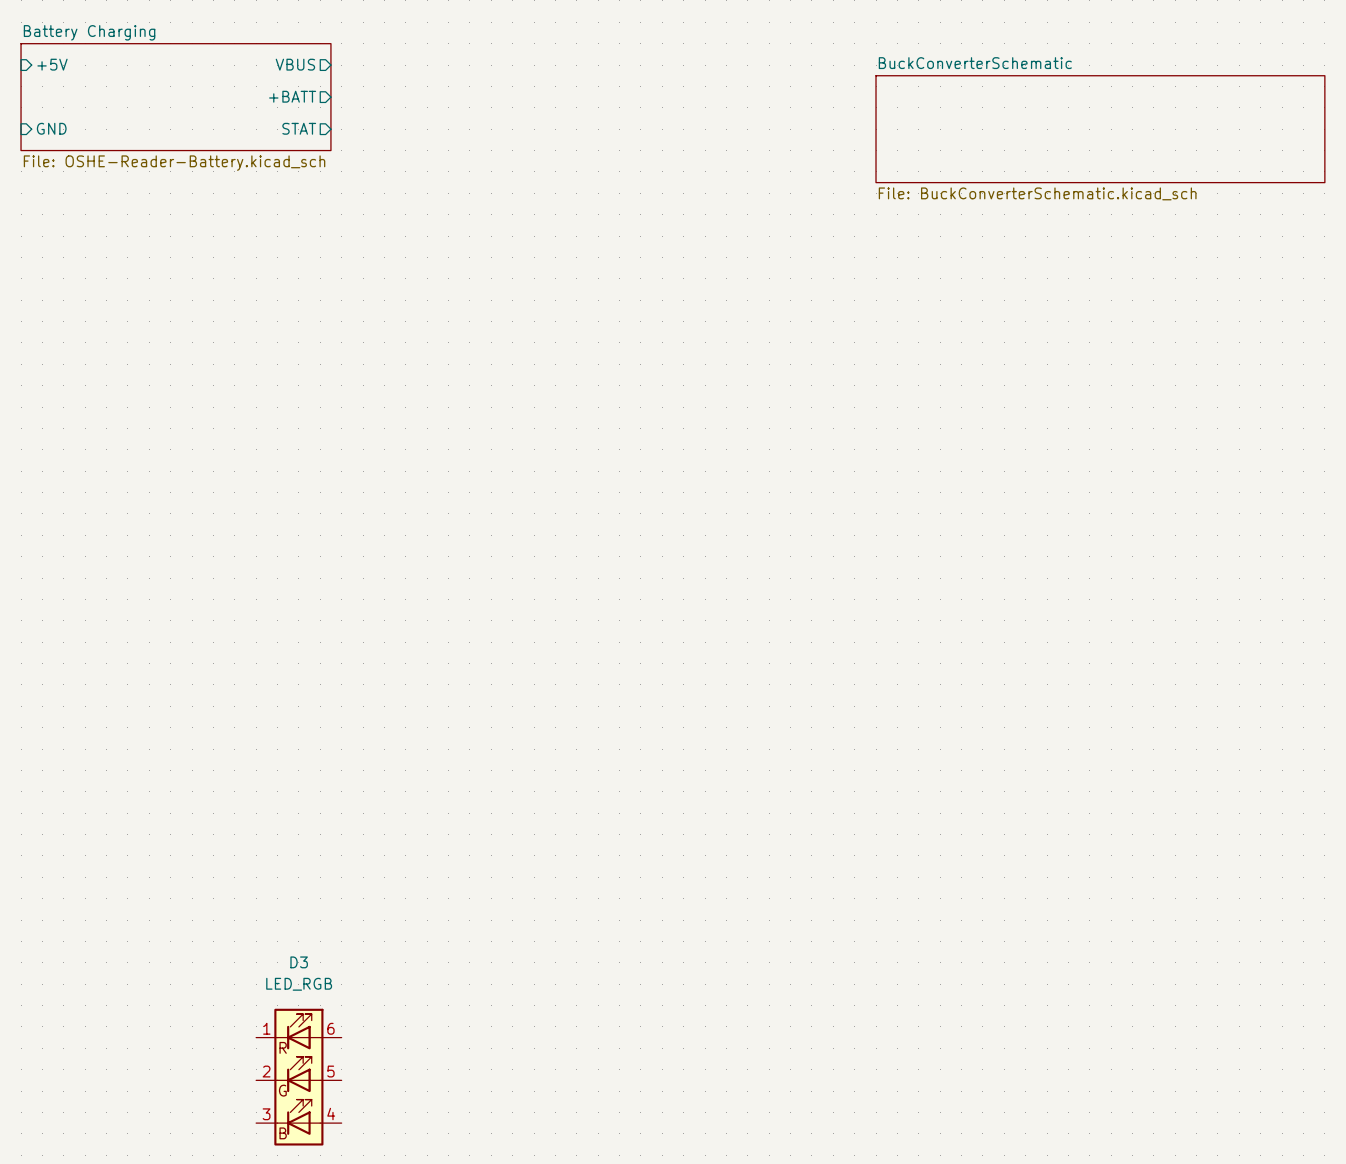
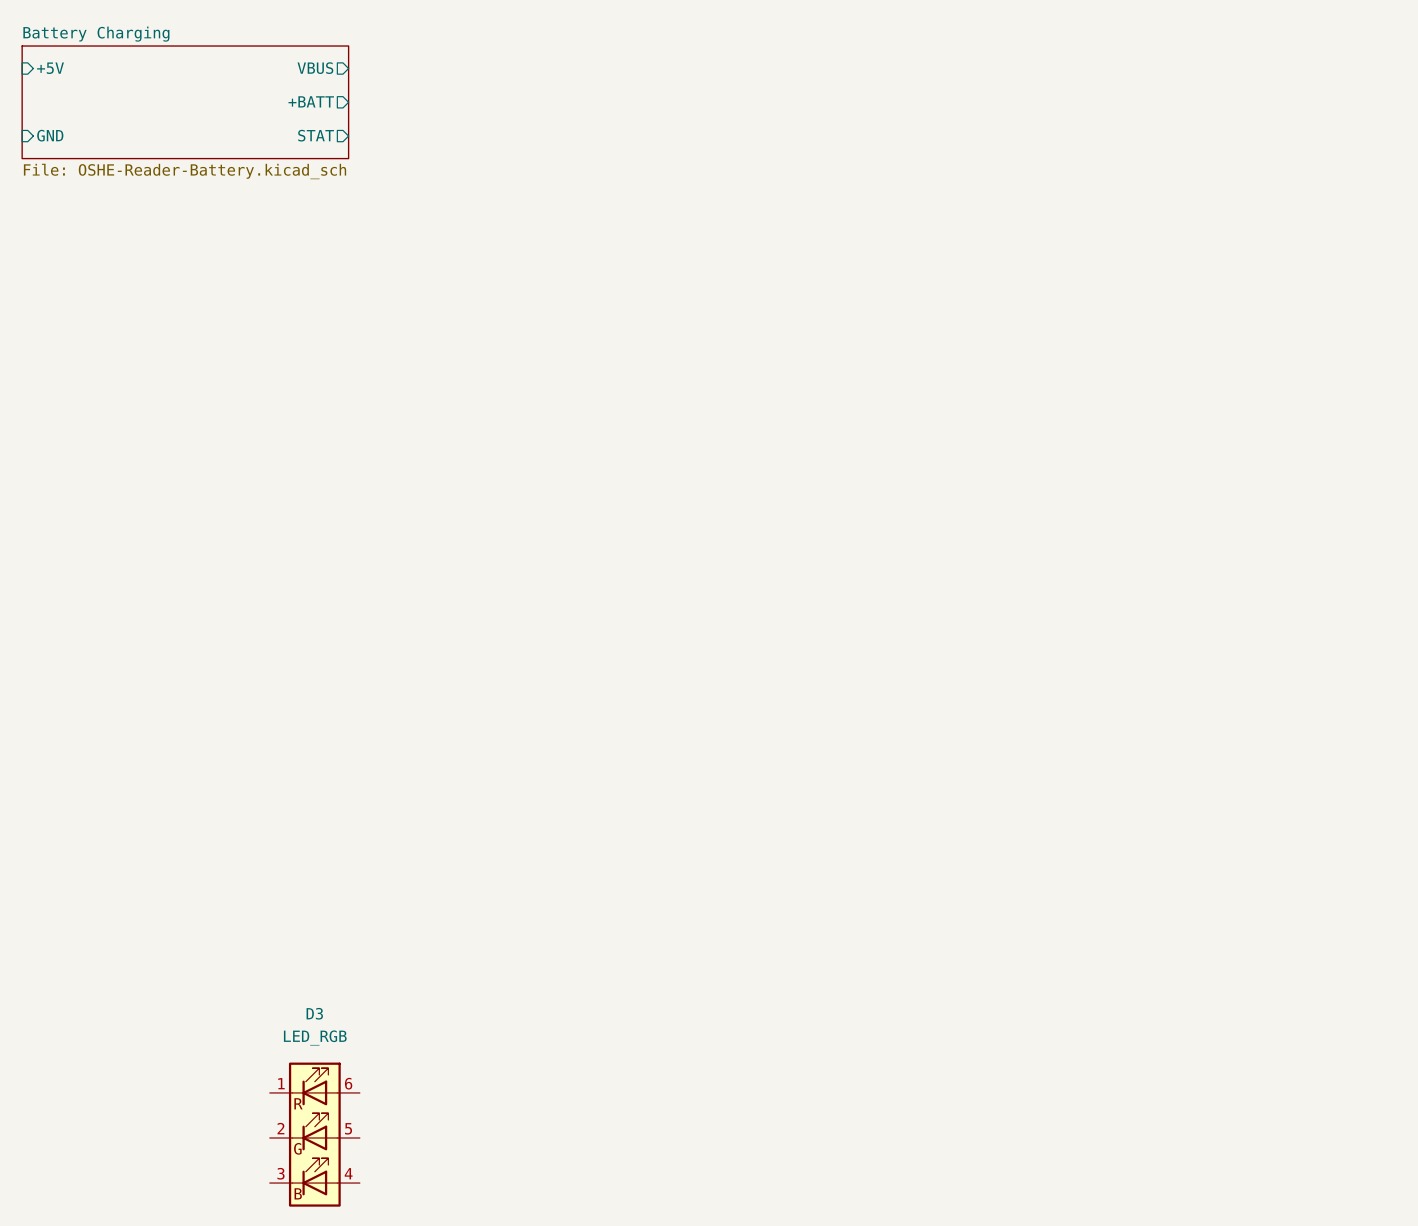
sheet BuckConverterSchematic: File: BuckConverterSchematic.kicad_sch (1100, 129) -> none

